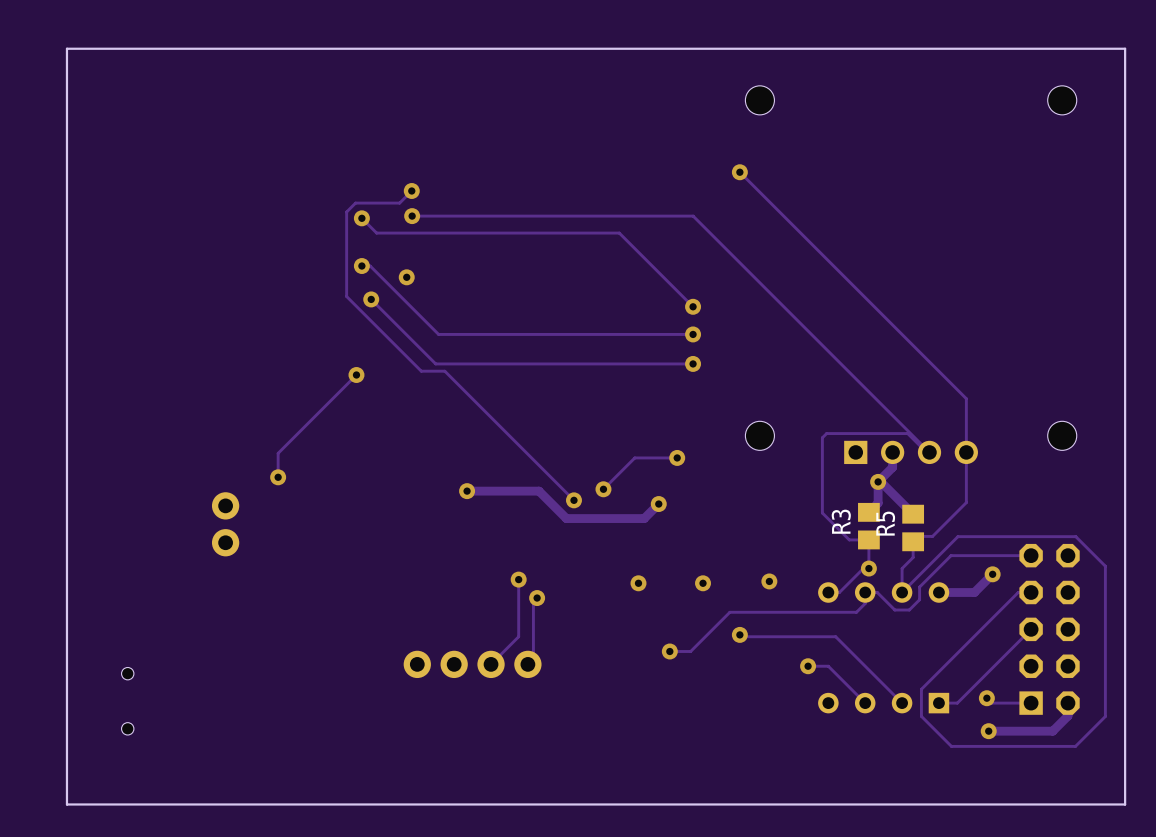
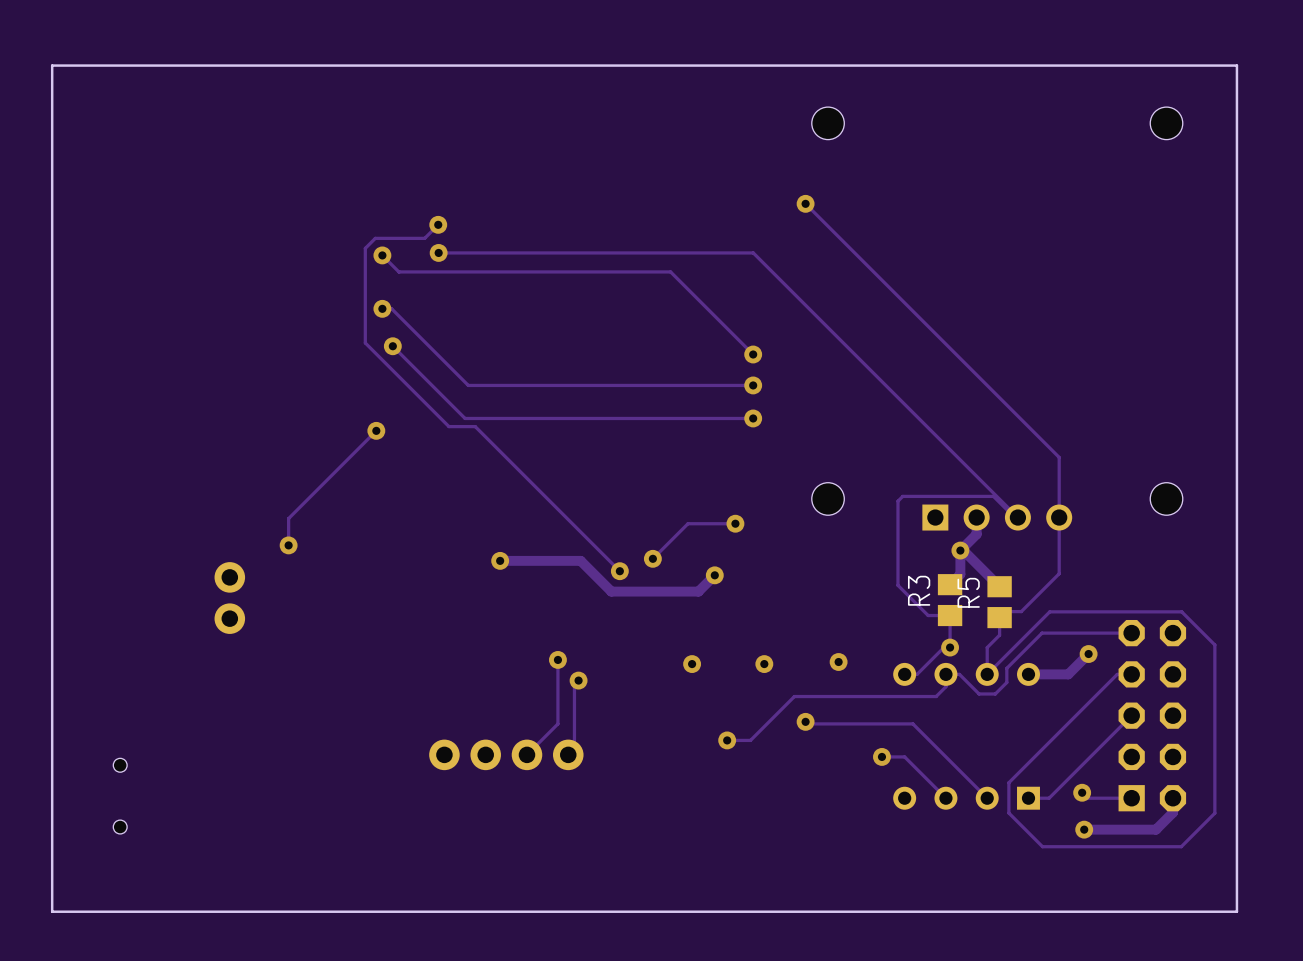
via: (406, 277) -> none

